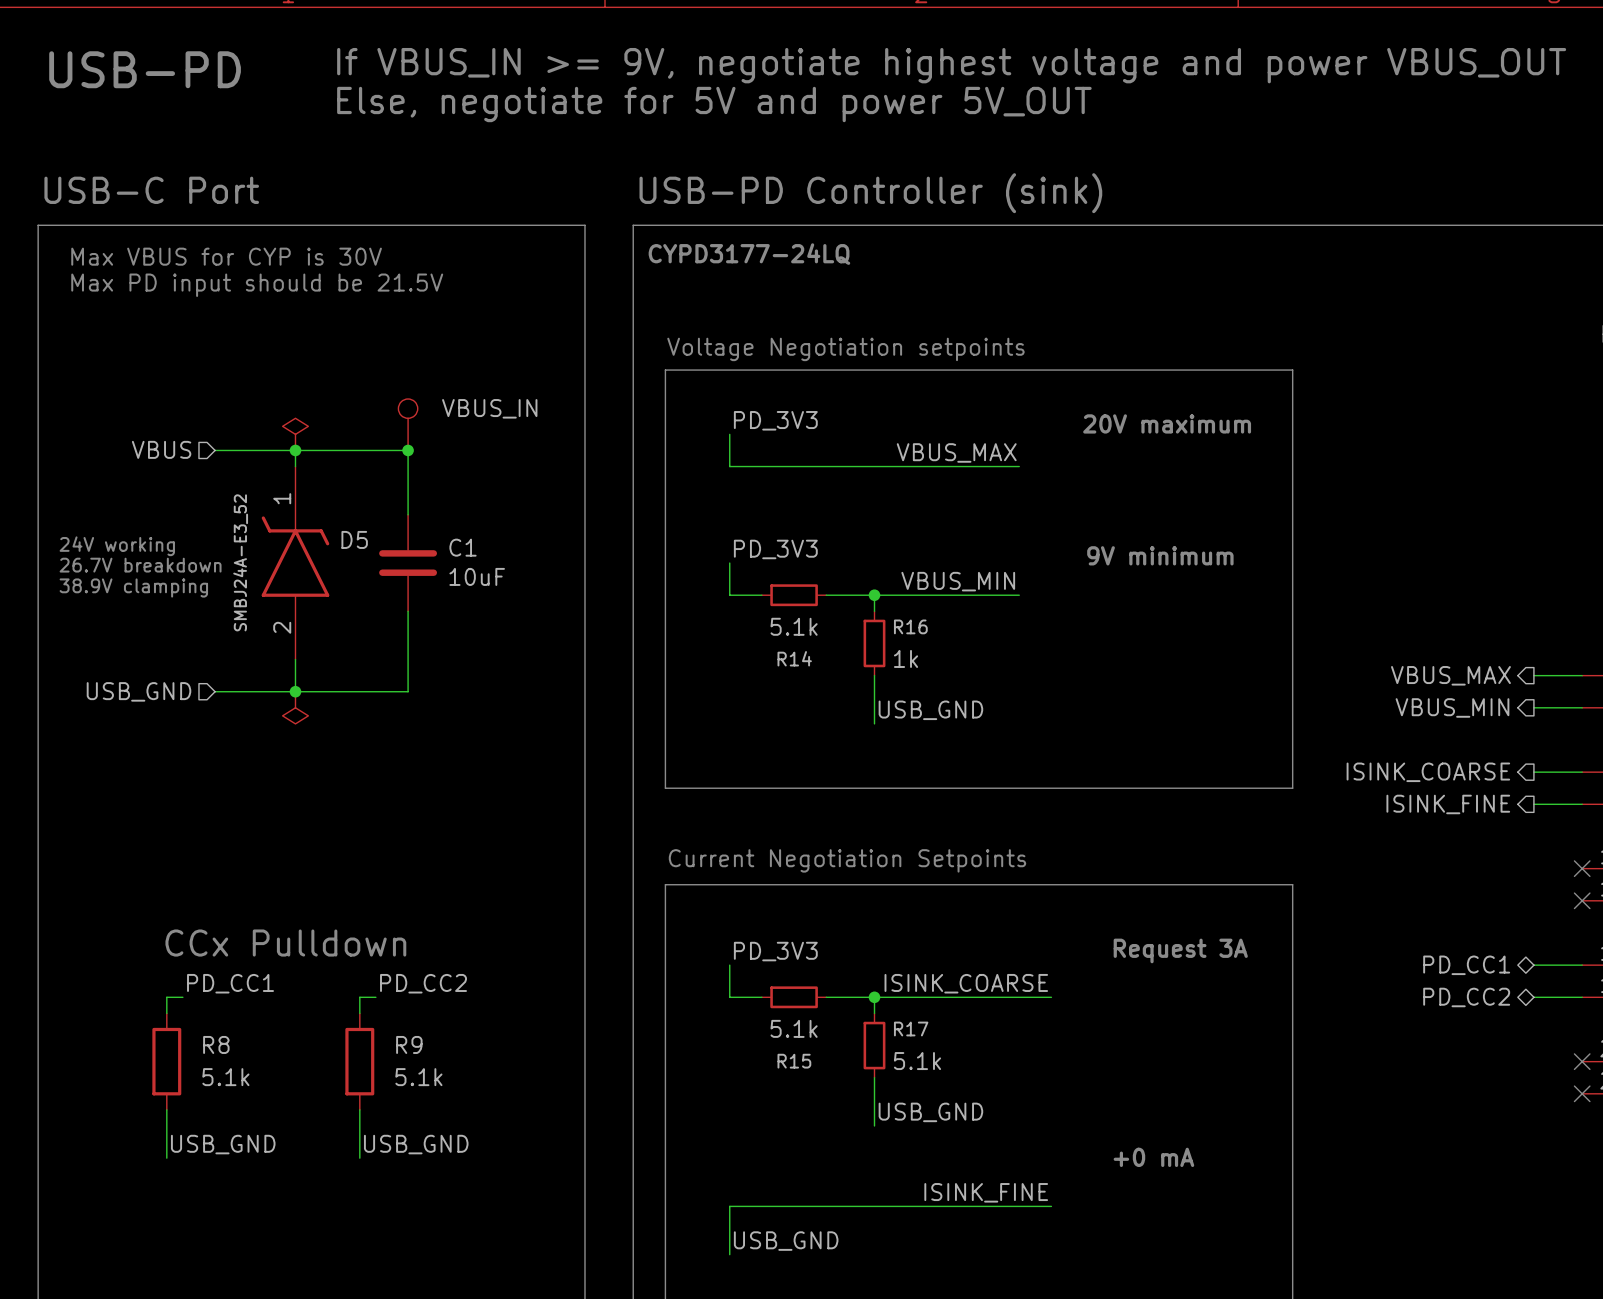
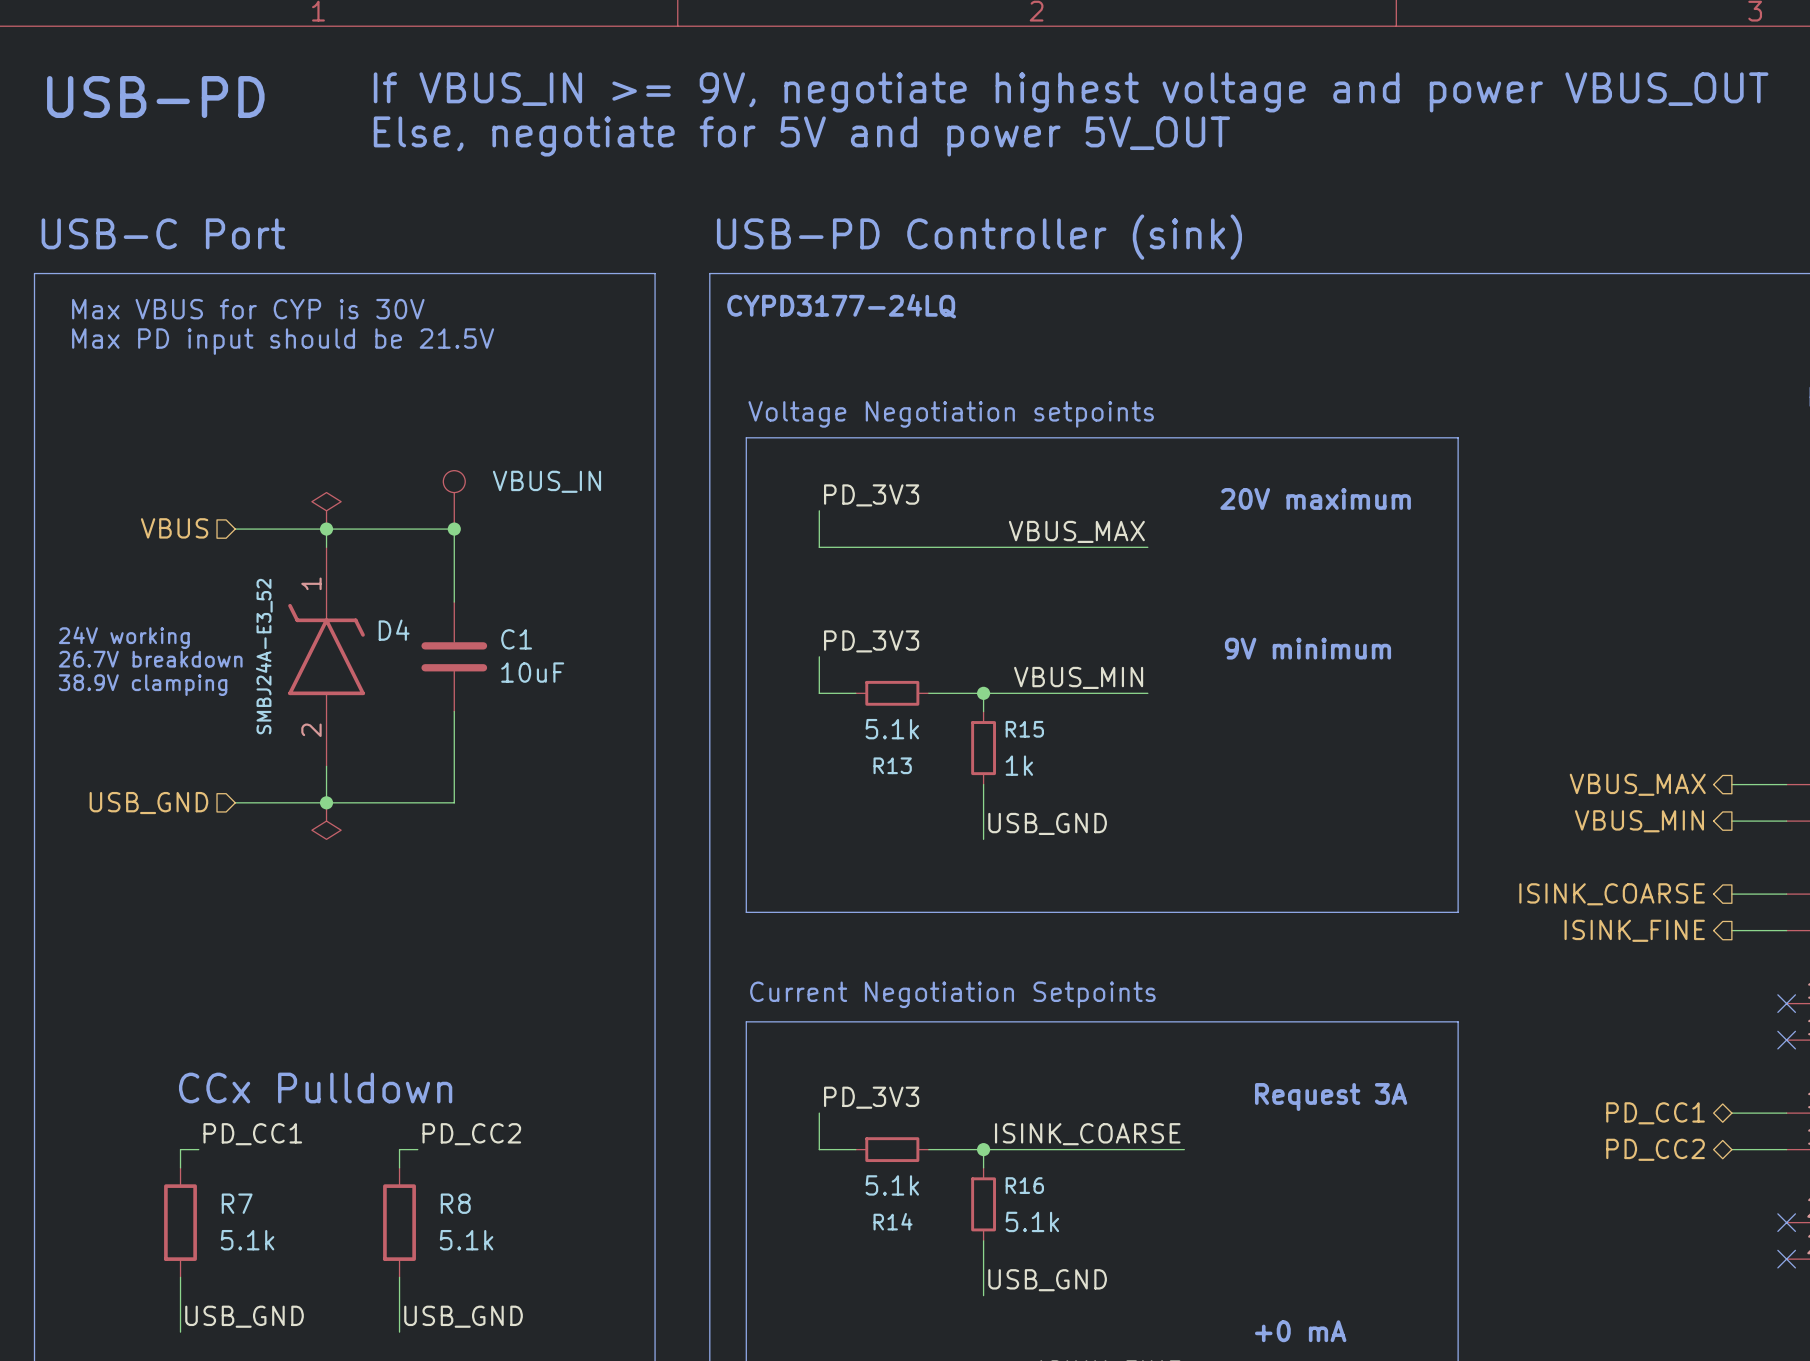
D5 name: D5 (354, 539) -> D4 (394, 630)
R16 name: R16 (910, 626) -> R15 (1024, 729)
R14 name: R14 (794, 658) -> R13 (892, 765)
R17 name: R17 (911, 1029) -> R16 (1024, 1185)
R8 name: R8 (216, 1044) -> R7 (237, 1203)
R9 name: R9 (409, 1044) -> R8 (455, 1203)
R15 name: R15 (794, 1061) -> R14 (893, 1221)

